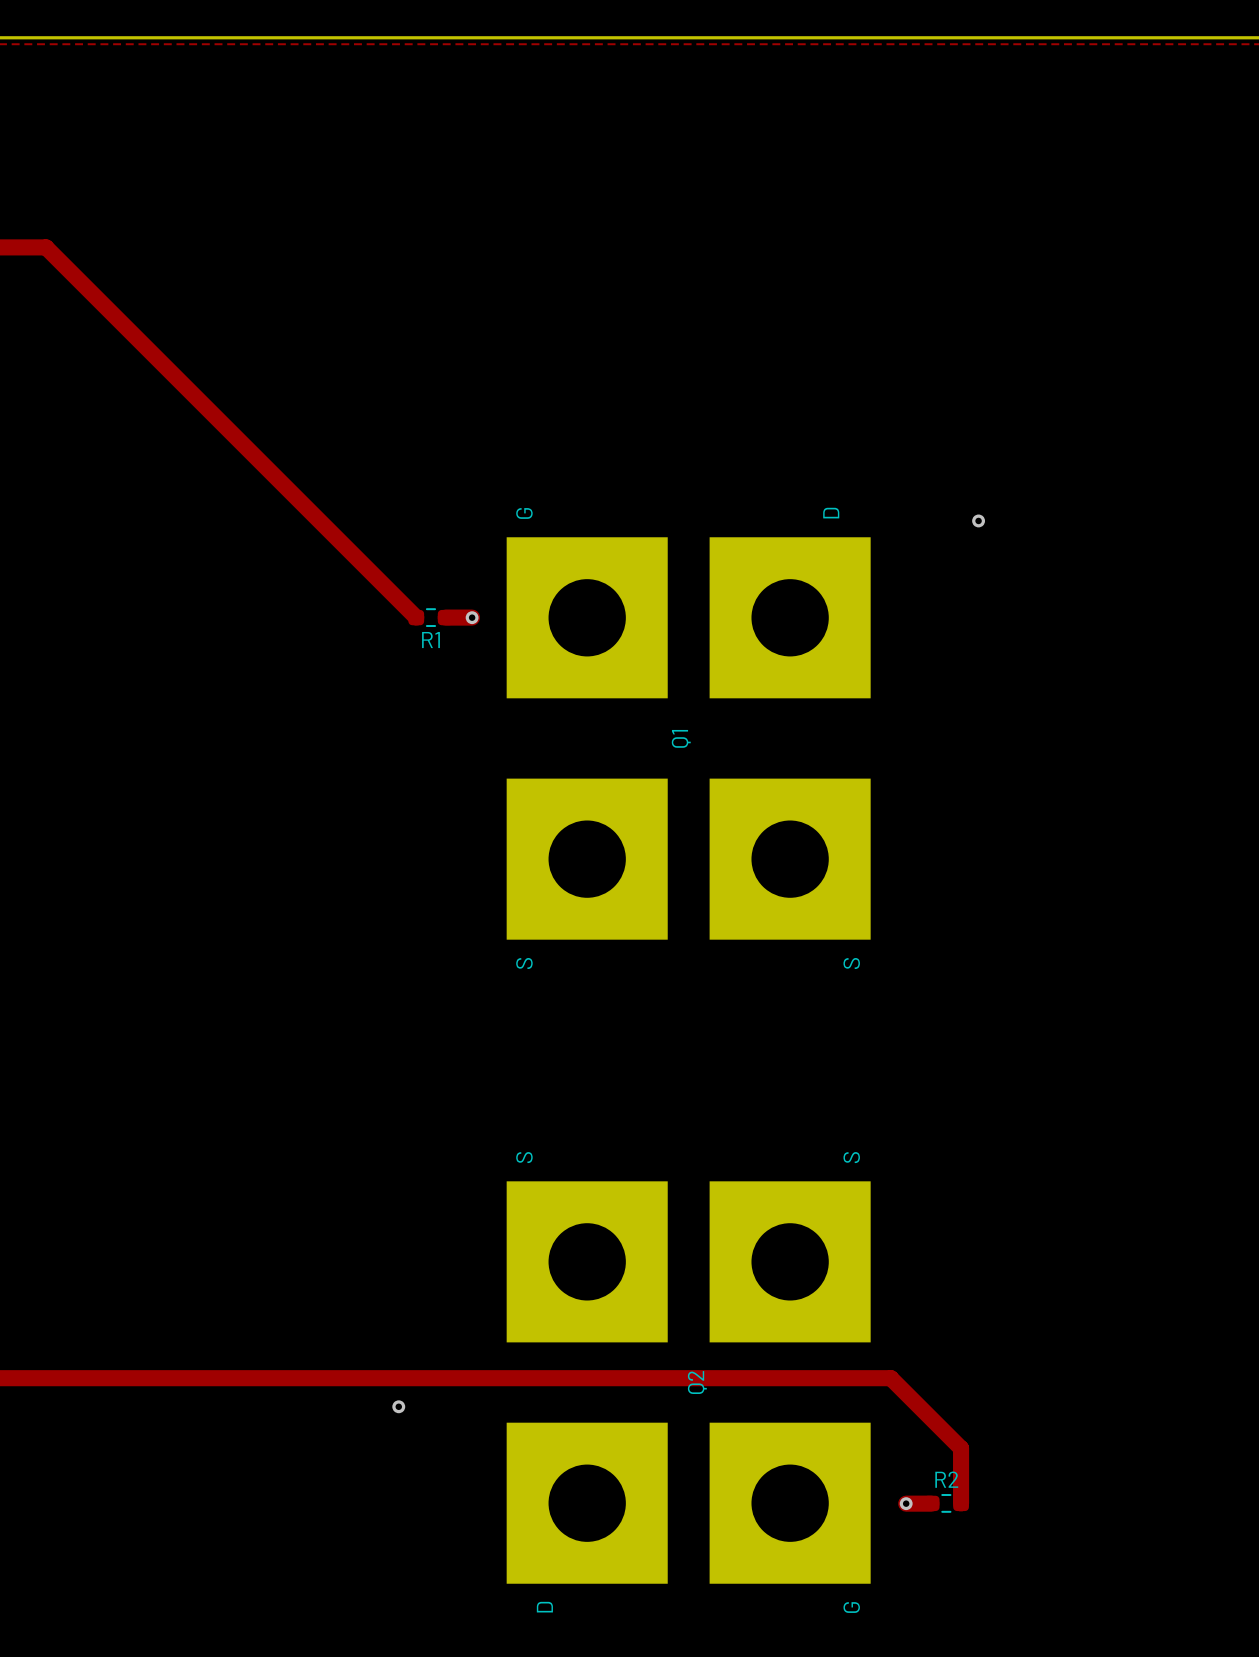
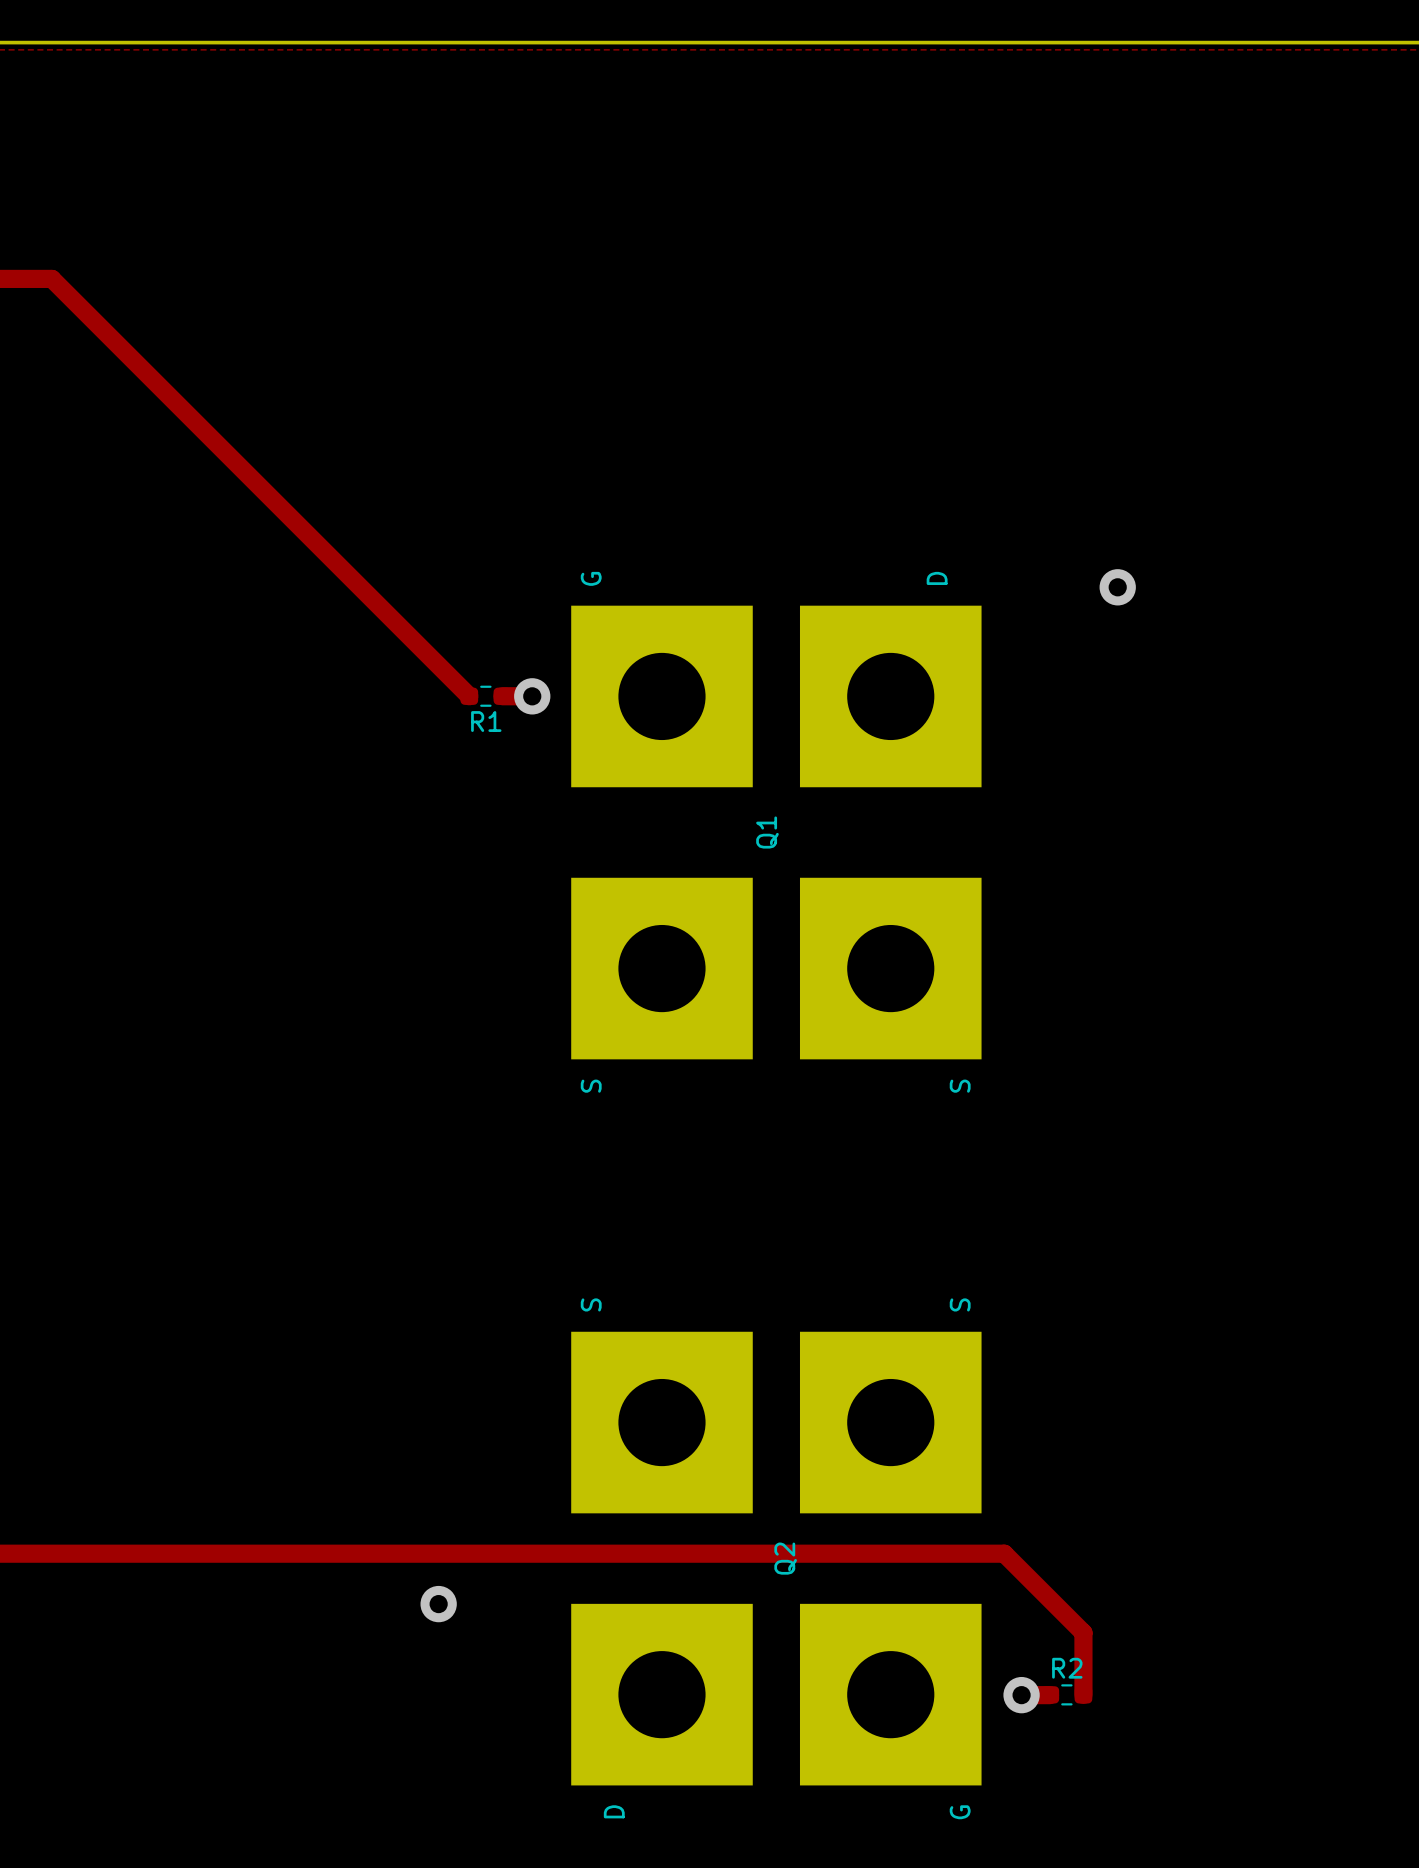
via size: [972, 514, 986, 528] -> [1099, 569, 1136, 606]
via size: [465, 611, 479, 625] -> [514, 678, 551, 715]
via: (398, 1406) -> none
via: none -> (438, 1604)
via size: [899, 1497, 913, 1511] -> [1003, 1676, 1040, 1714]

